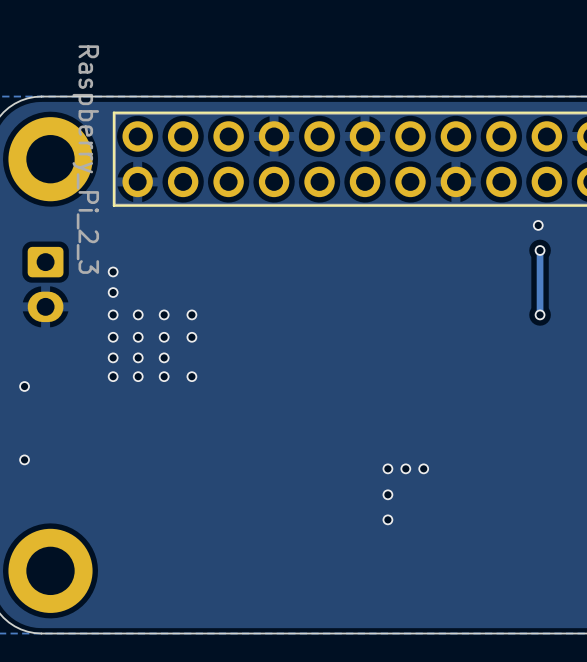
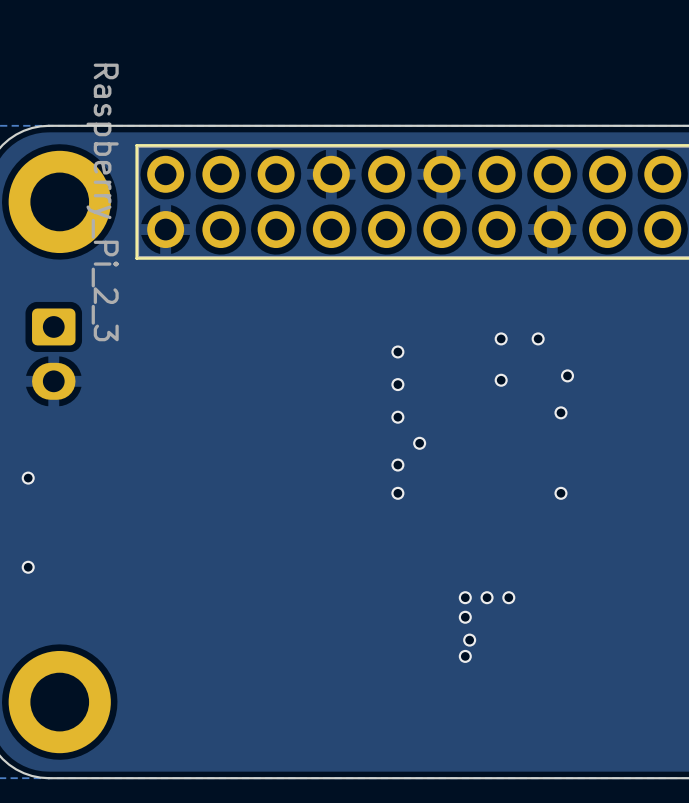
via: (538, 225) -> none
track: (540, 250) (540, 314) -> none
via: (540, 250) -> none
via: (113, 271) -> none
via: none -> (501, 338)
via: none -> (538, 338)
via: none -> (397, 351)
via: (113, 292) -> none
via: none -> (567, 375)
via: none -> (501, 380)
via: none -> (397, 384)
via: (113, 314) -> none
via: (138, 314) -> none
via: (164, 314) -> none
via: (191, 314) -> none
via: (540, 314) -> none
via: none -> (560, 412)
via: none -> (397, 417)
via: (113, 337) -> none
via: (138, 337) -> none
via: (164, 337) -> none
via: (191, 337) -> none
via: (113, 357) -> none
via: (138, 357) -> none
via: (164, 357) -> none
via: none -> (419, 443)
via: none -> (397, 465)
via: (113, 376) -> none
via: (138, 376) -> none
via: (164, 376) -> none
via: (191, 376) -> none
via: none -> (397, 493)
via: none -> (560, 493)
via: (387, 468) -> none
via: (405, 468) -> none
via: (423, 468) -> none
via: none -> (465, 597)
via: none -> (487, 597)
via: none -> (508, 597)
via: (387, 494) -> none
via: none -> (465, 617)
via: none -> (465, 656)

